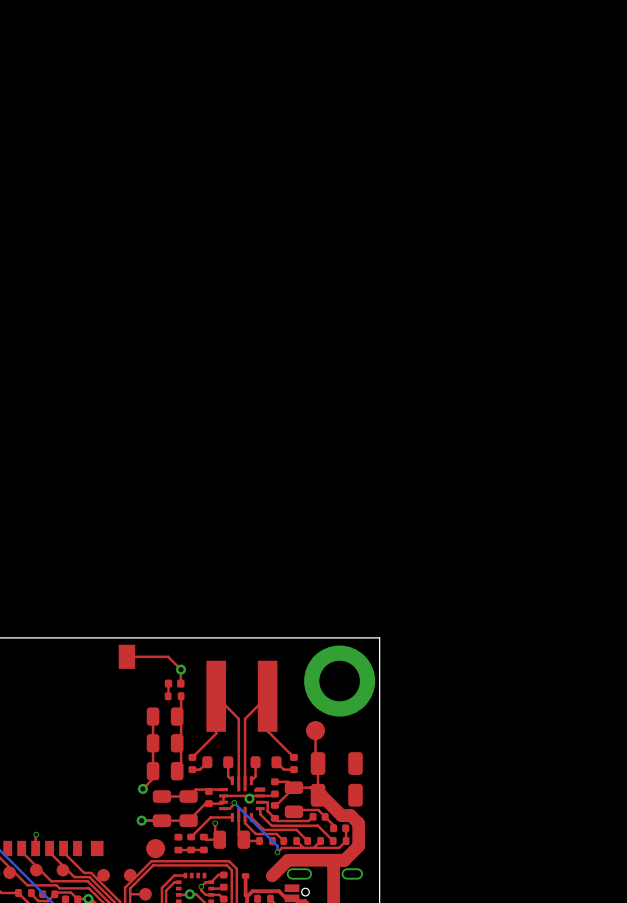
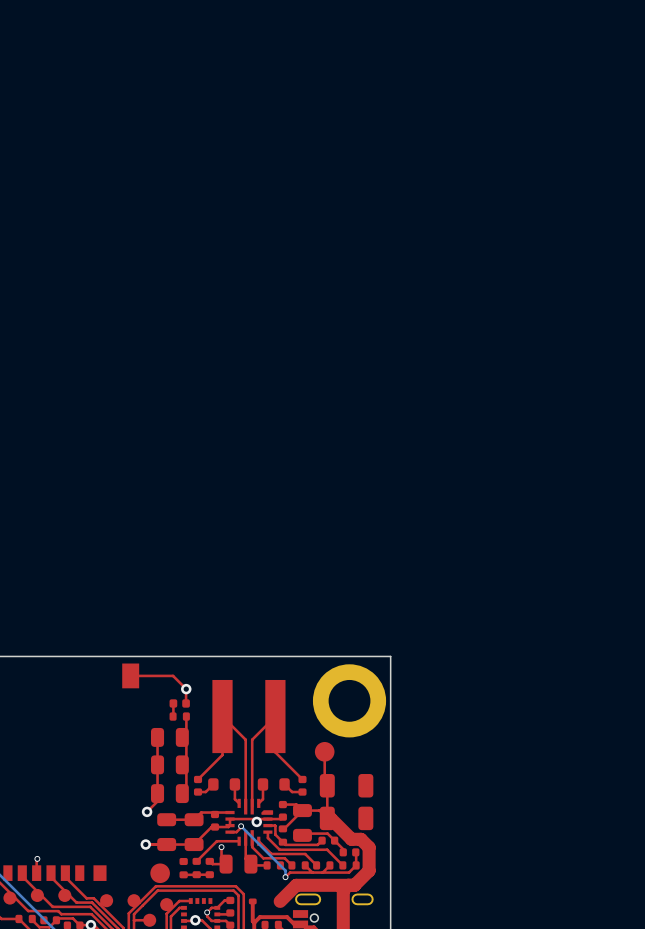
part: none -> (166, 904)

